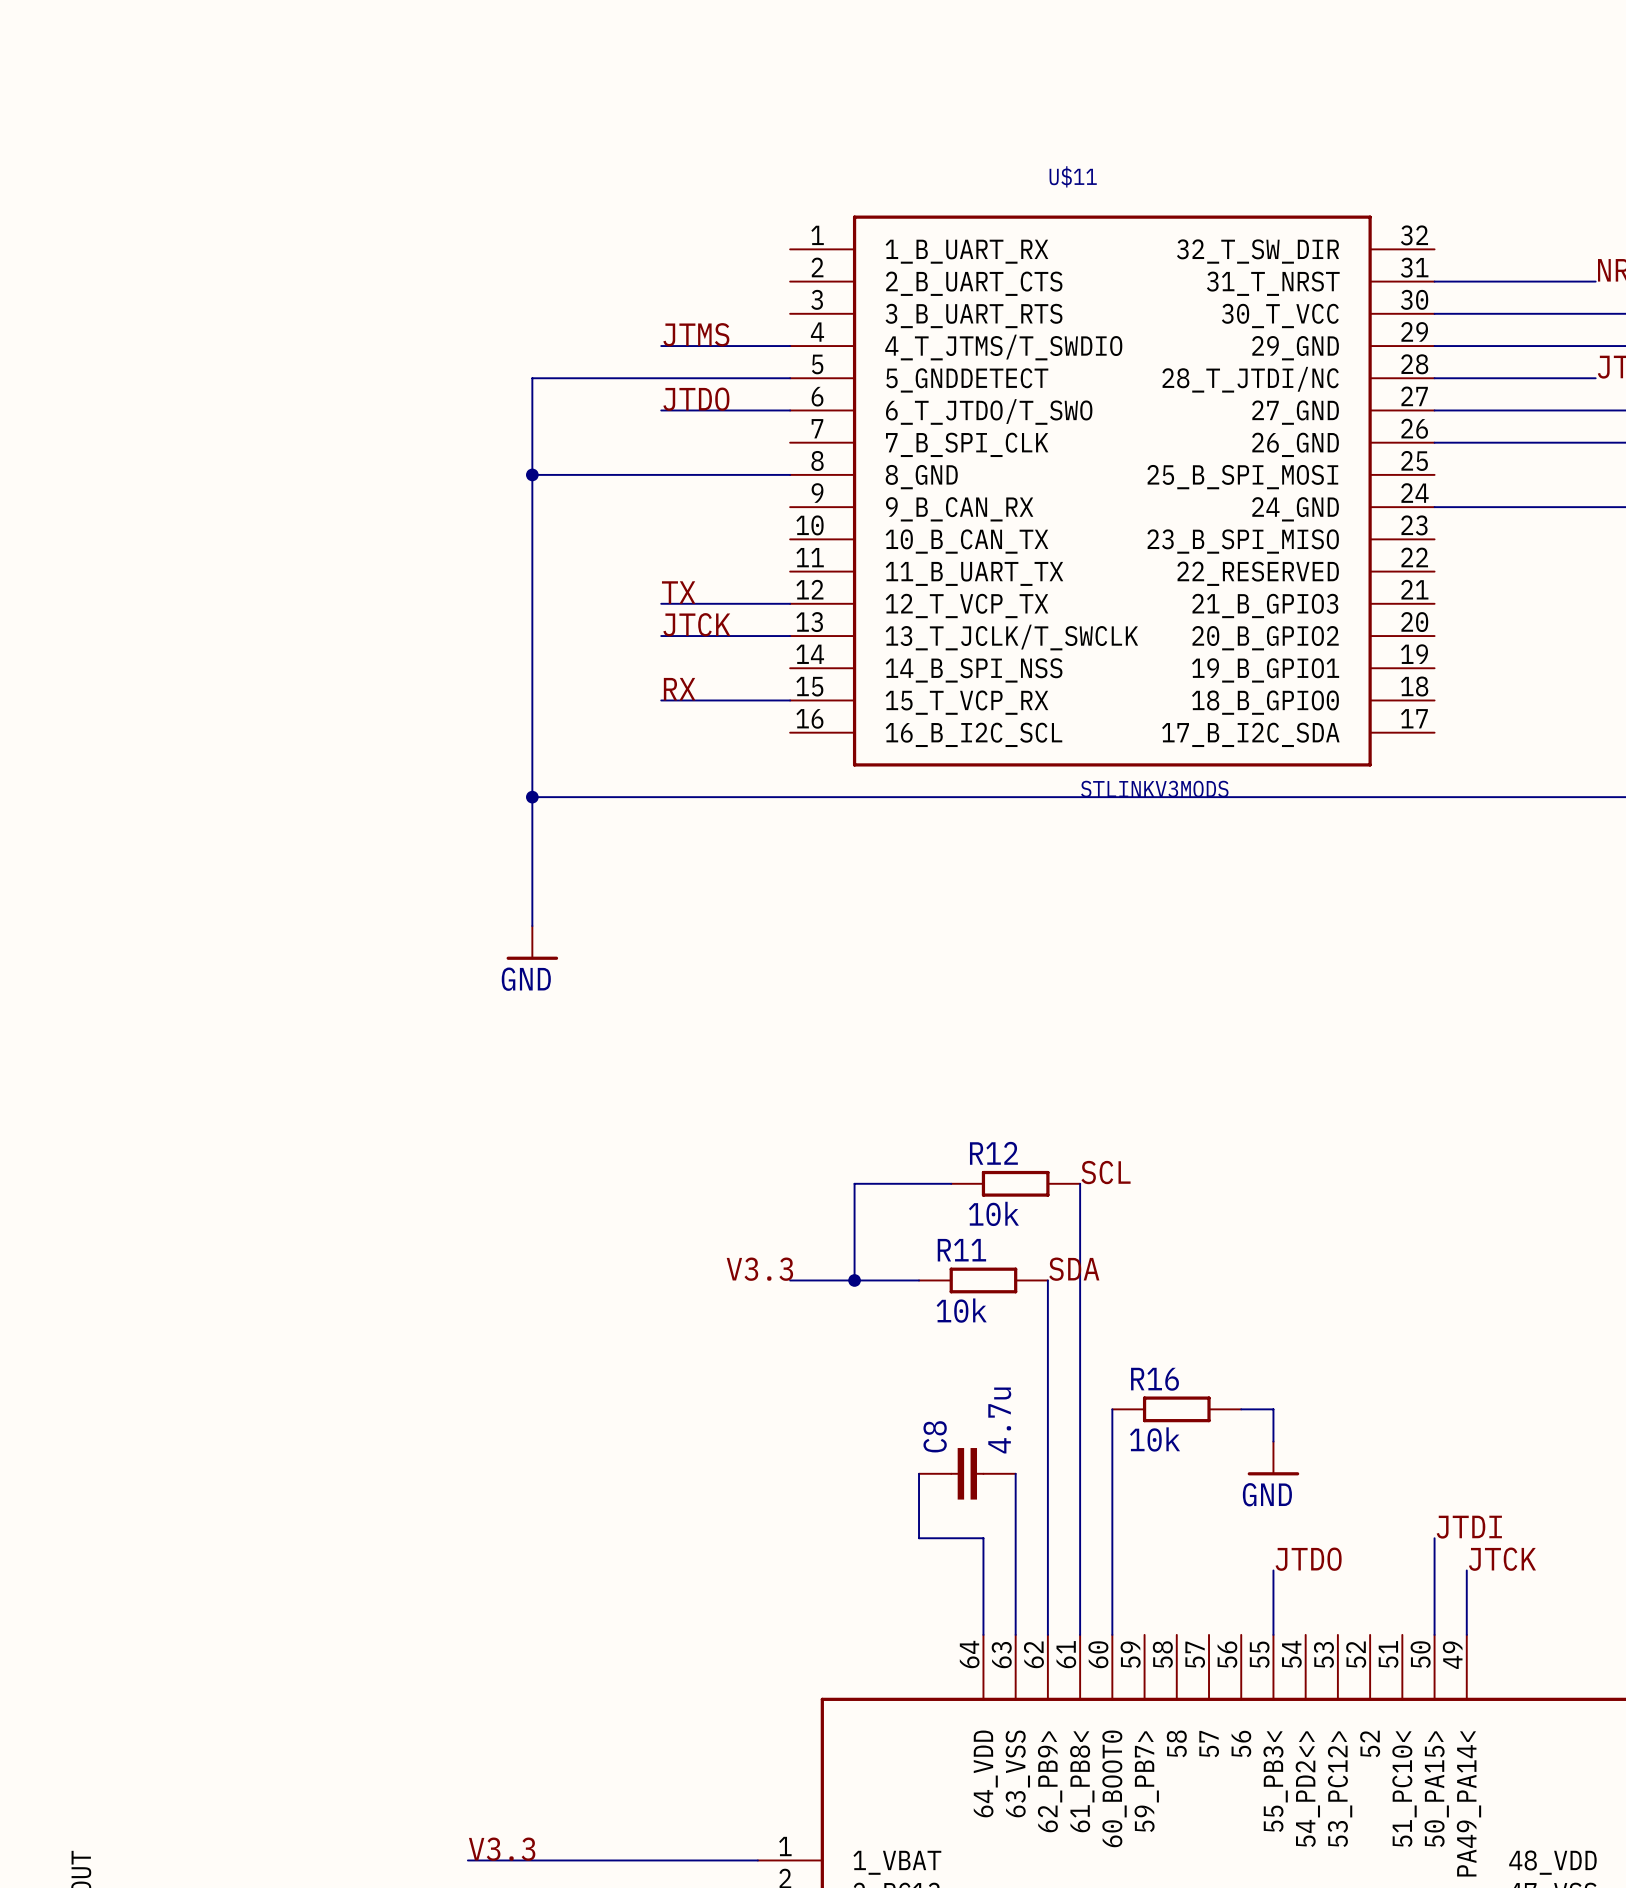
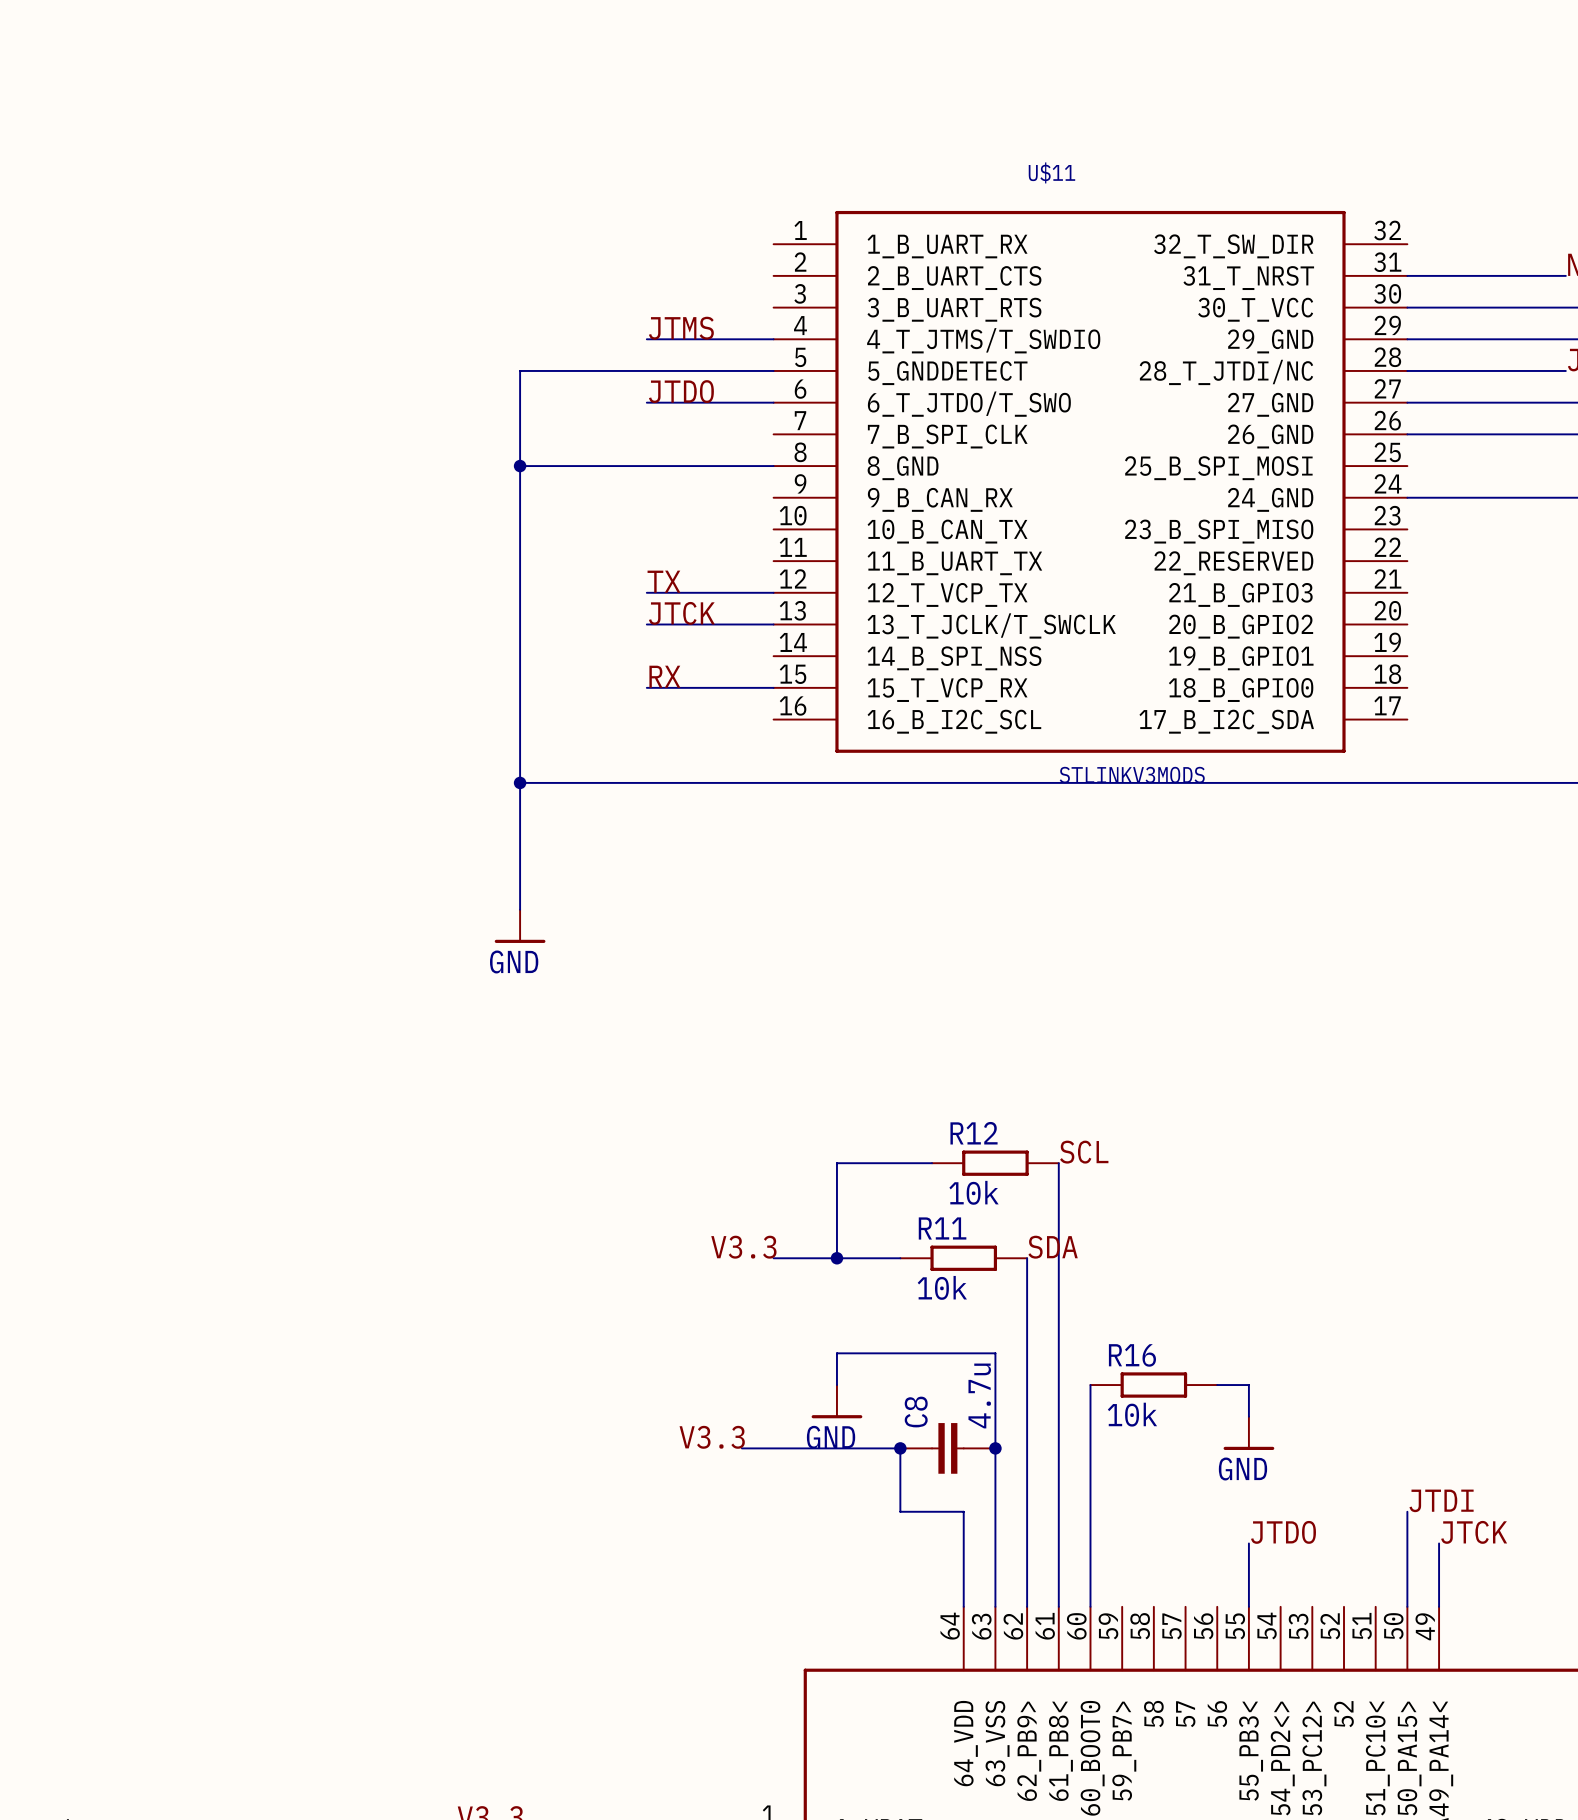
wire: none -> (836, 1385) (836, 1353) (995, 1353) (995, 1448)
power symbol: none -> GND (836, 1401)
label: none -> V3.3 (712, 1437)
wire: none -> (741, 1448) (900, 1448)
junction: none -> (900, 1448)
junction: none -> (995, 1448)

